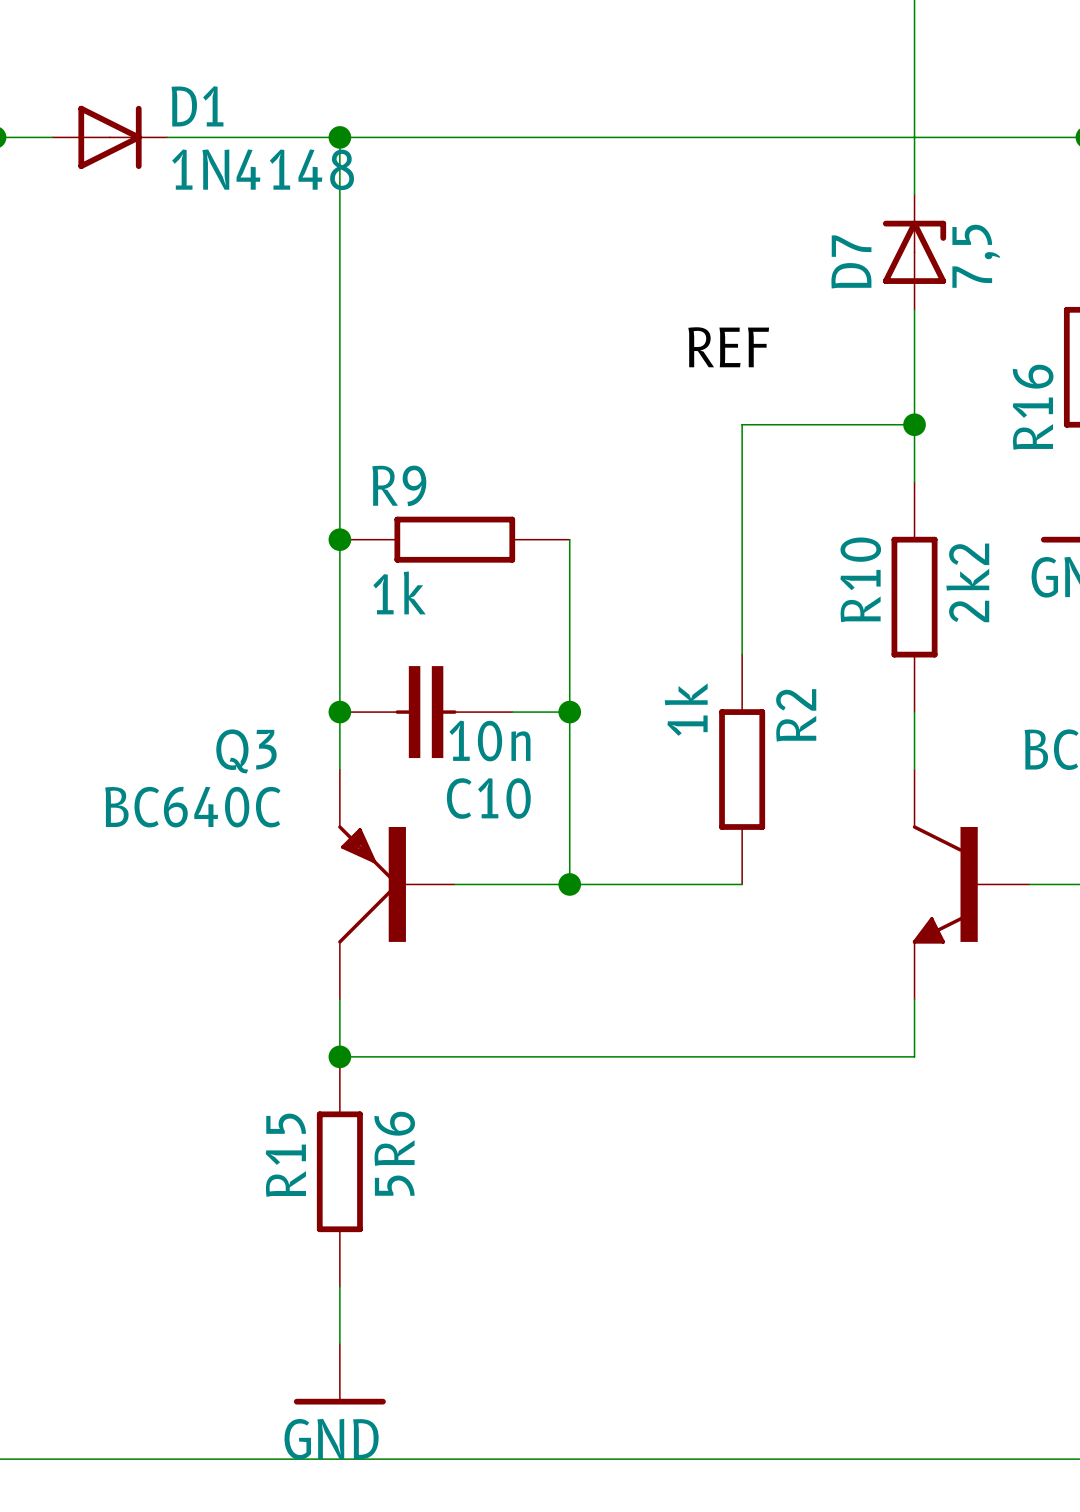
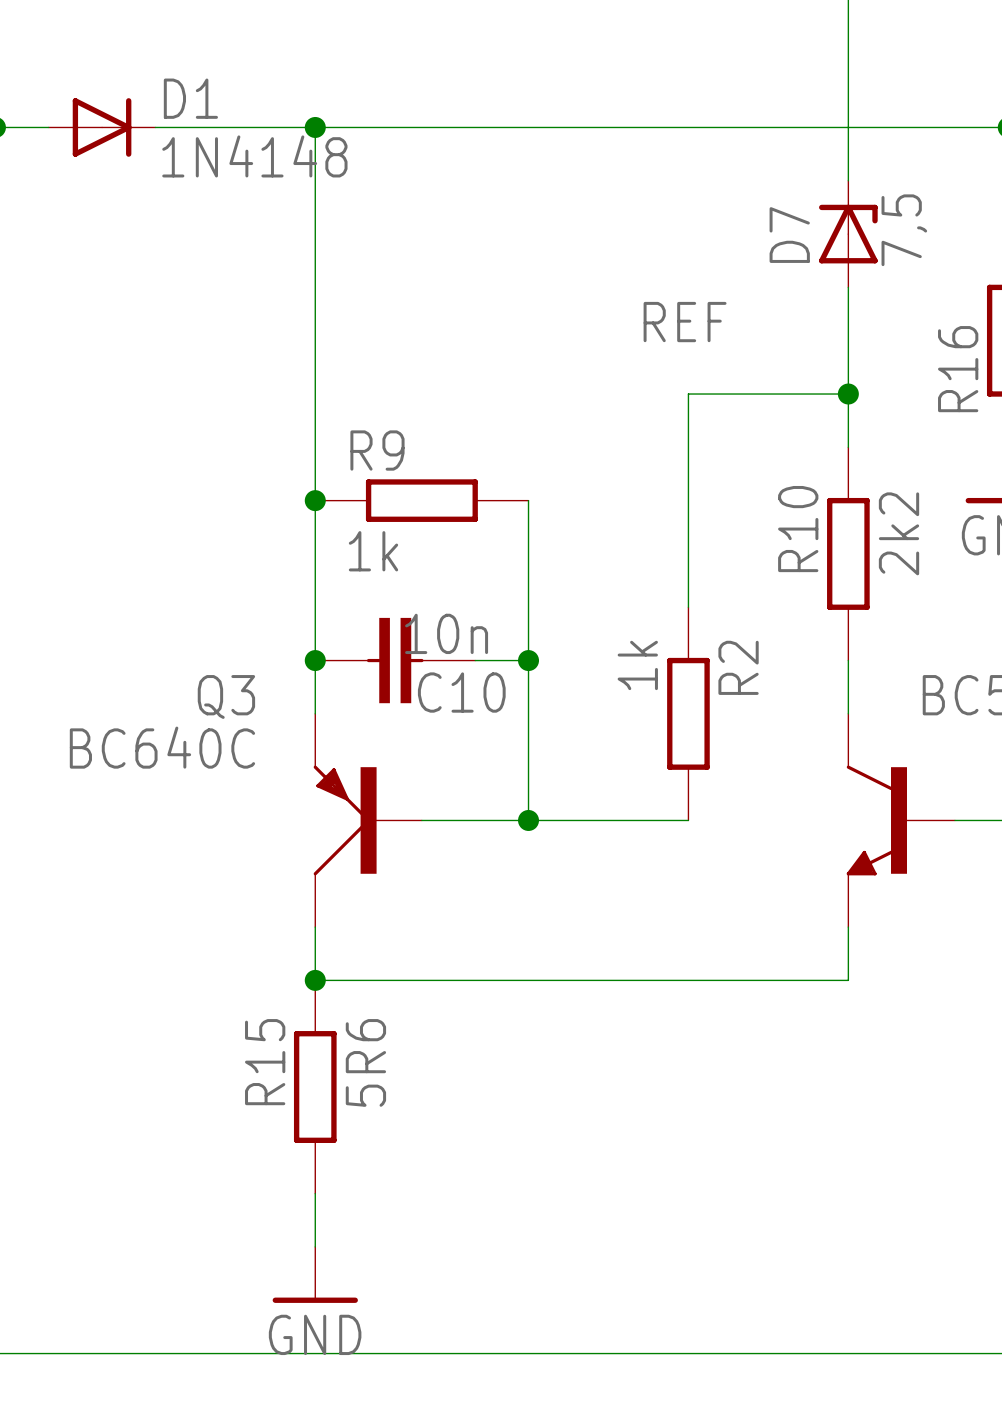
C10 value position: 10n (489, 741) -> 10n (446, 633)
C10 name position: C10 (488, 798) -> C10 (461, 692)

